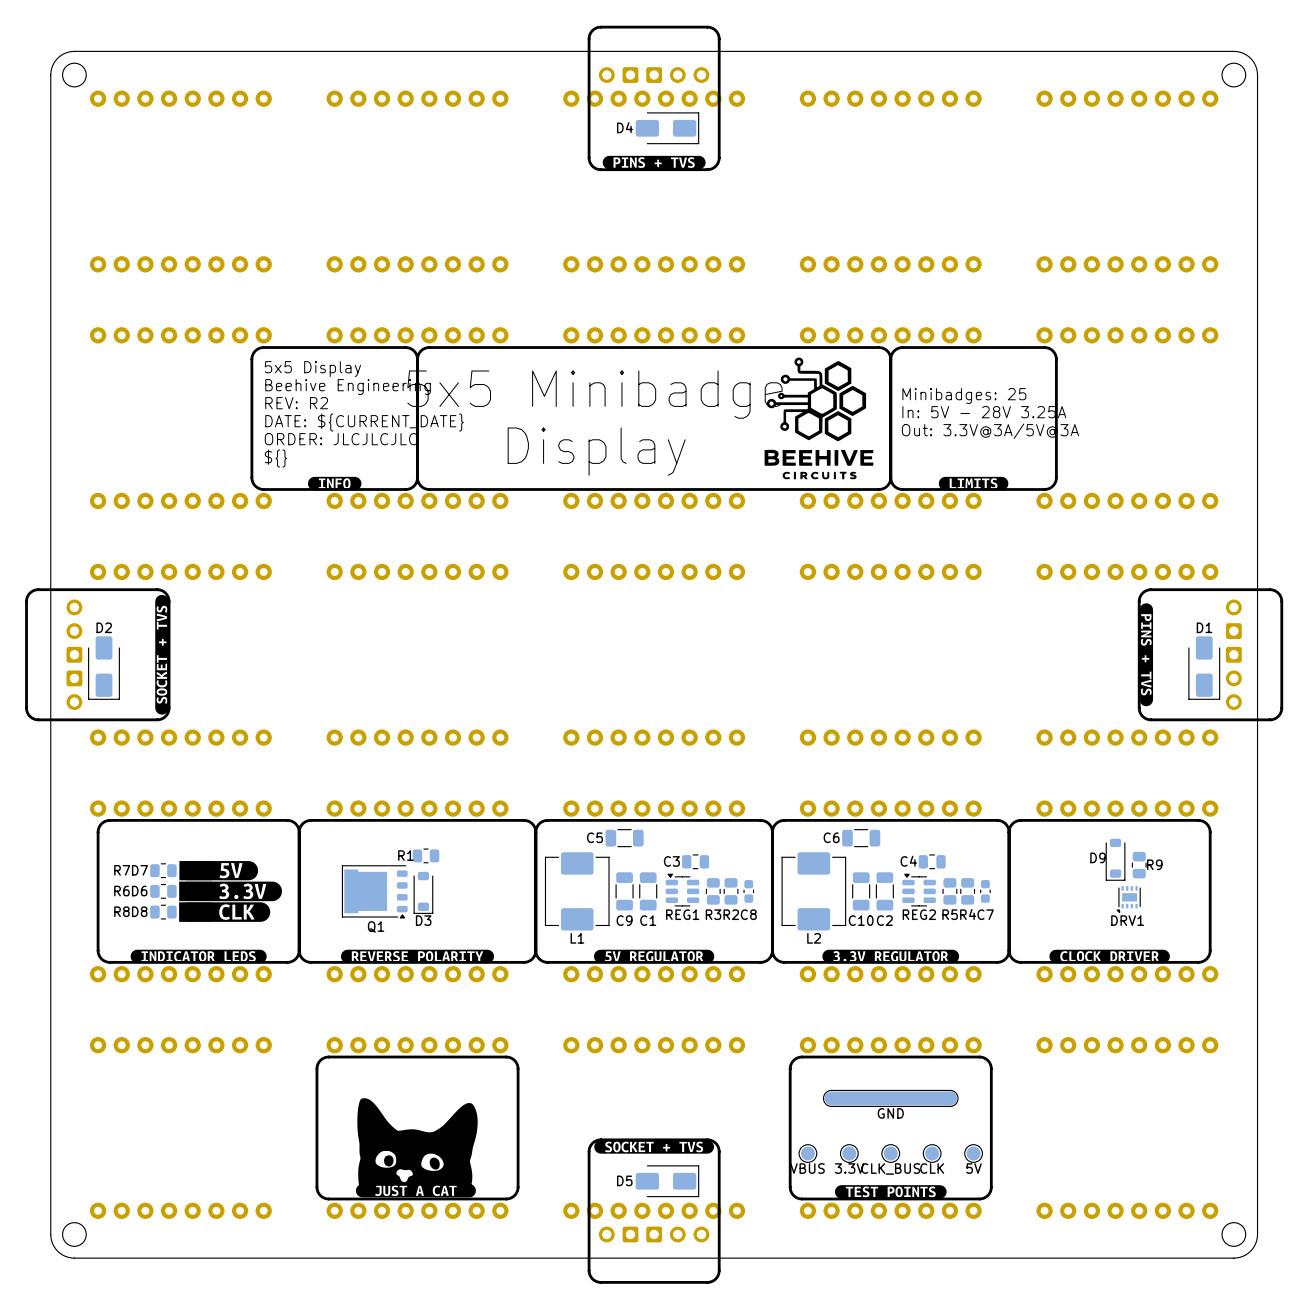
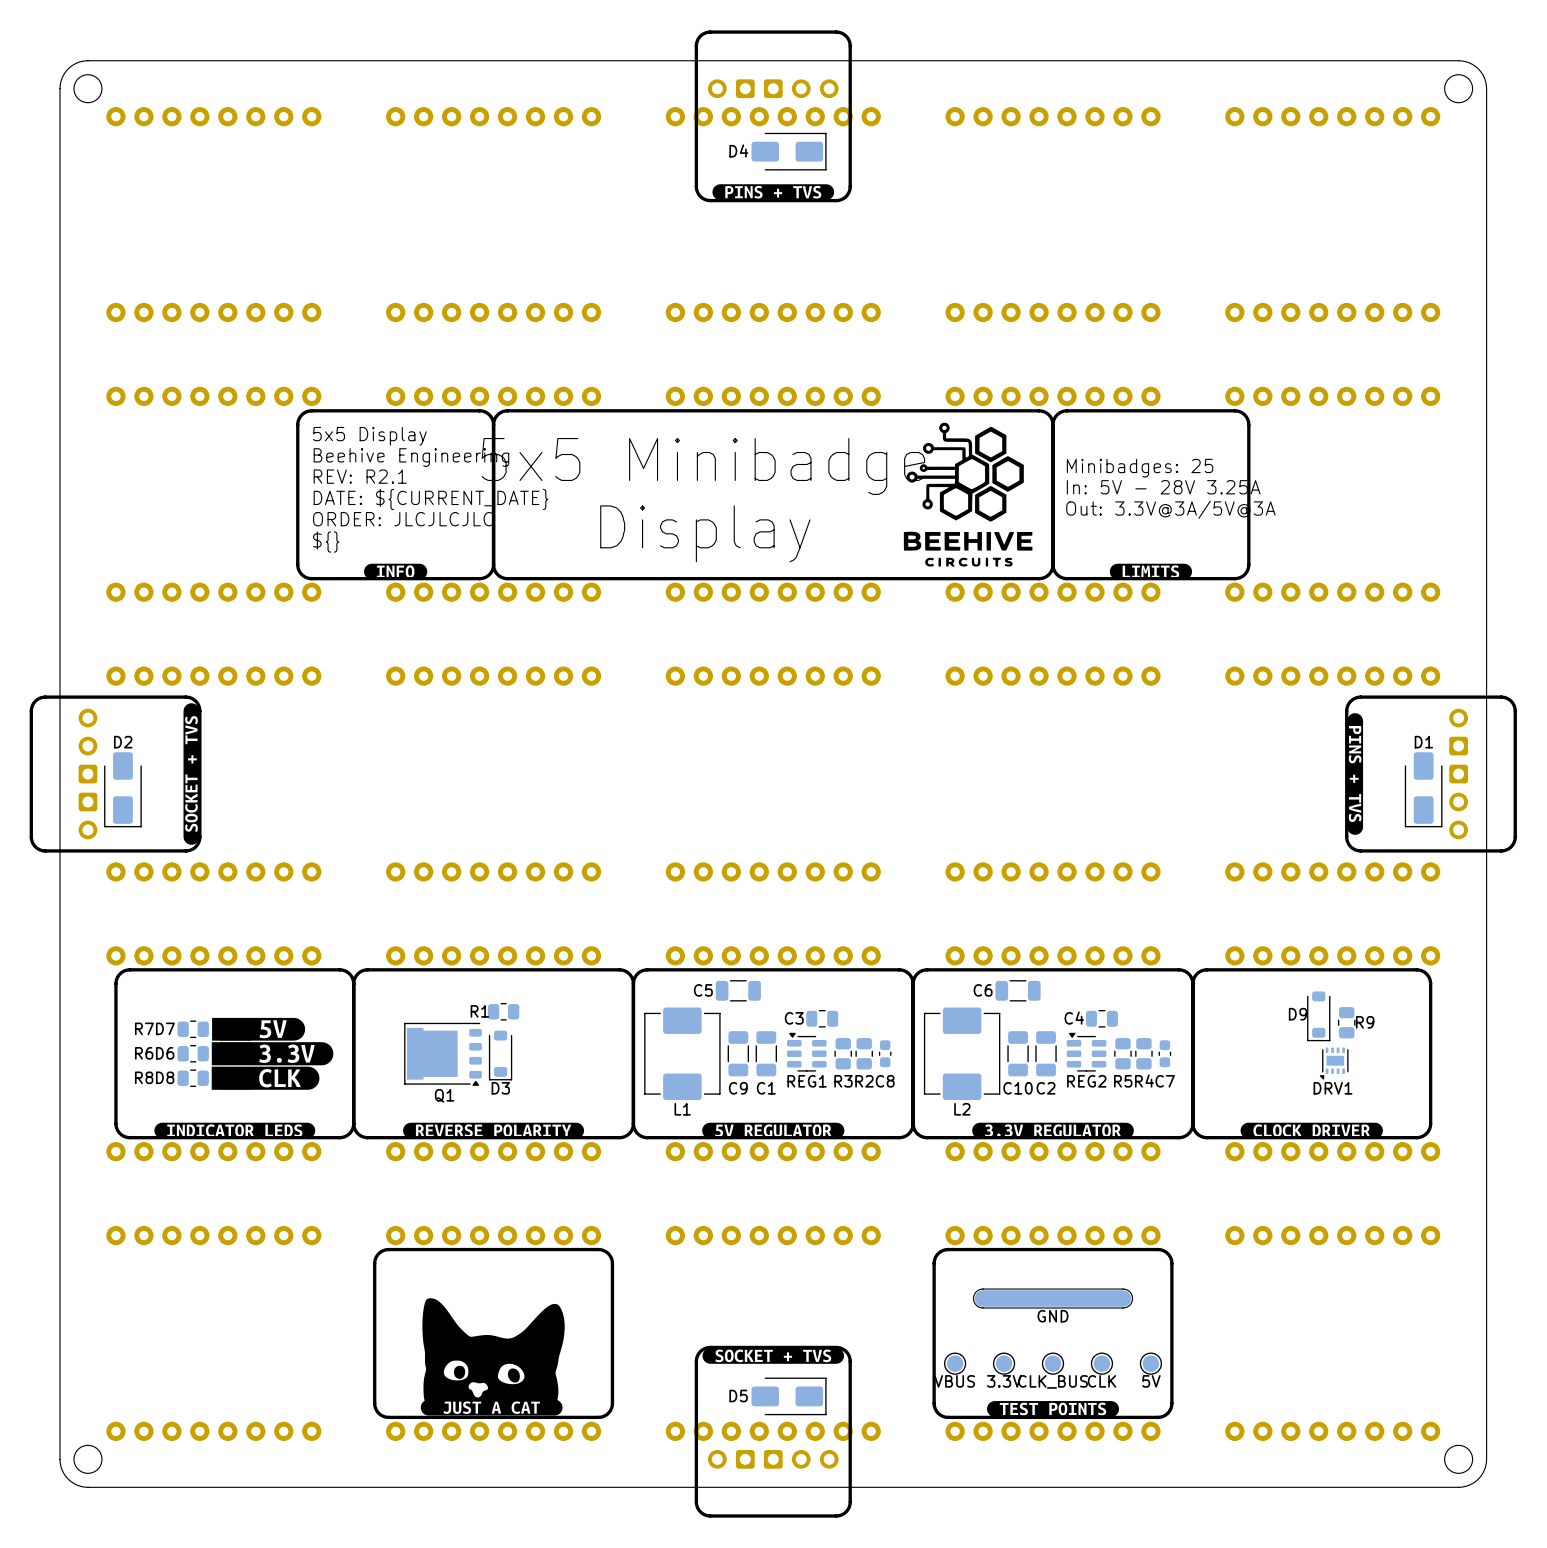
text: REV: R2 (296, 403) -> REV: R2.1 (360, 476)

